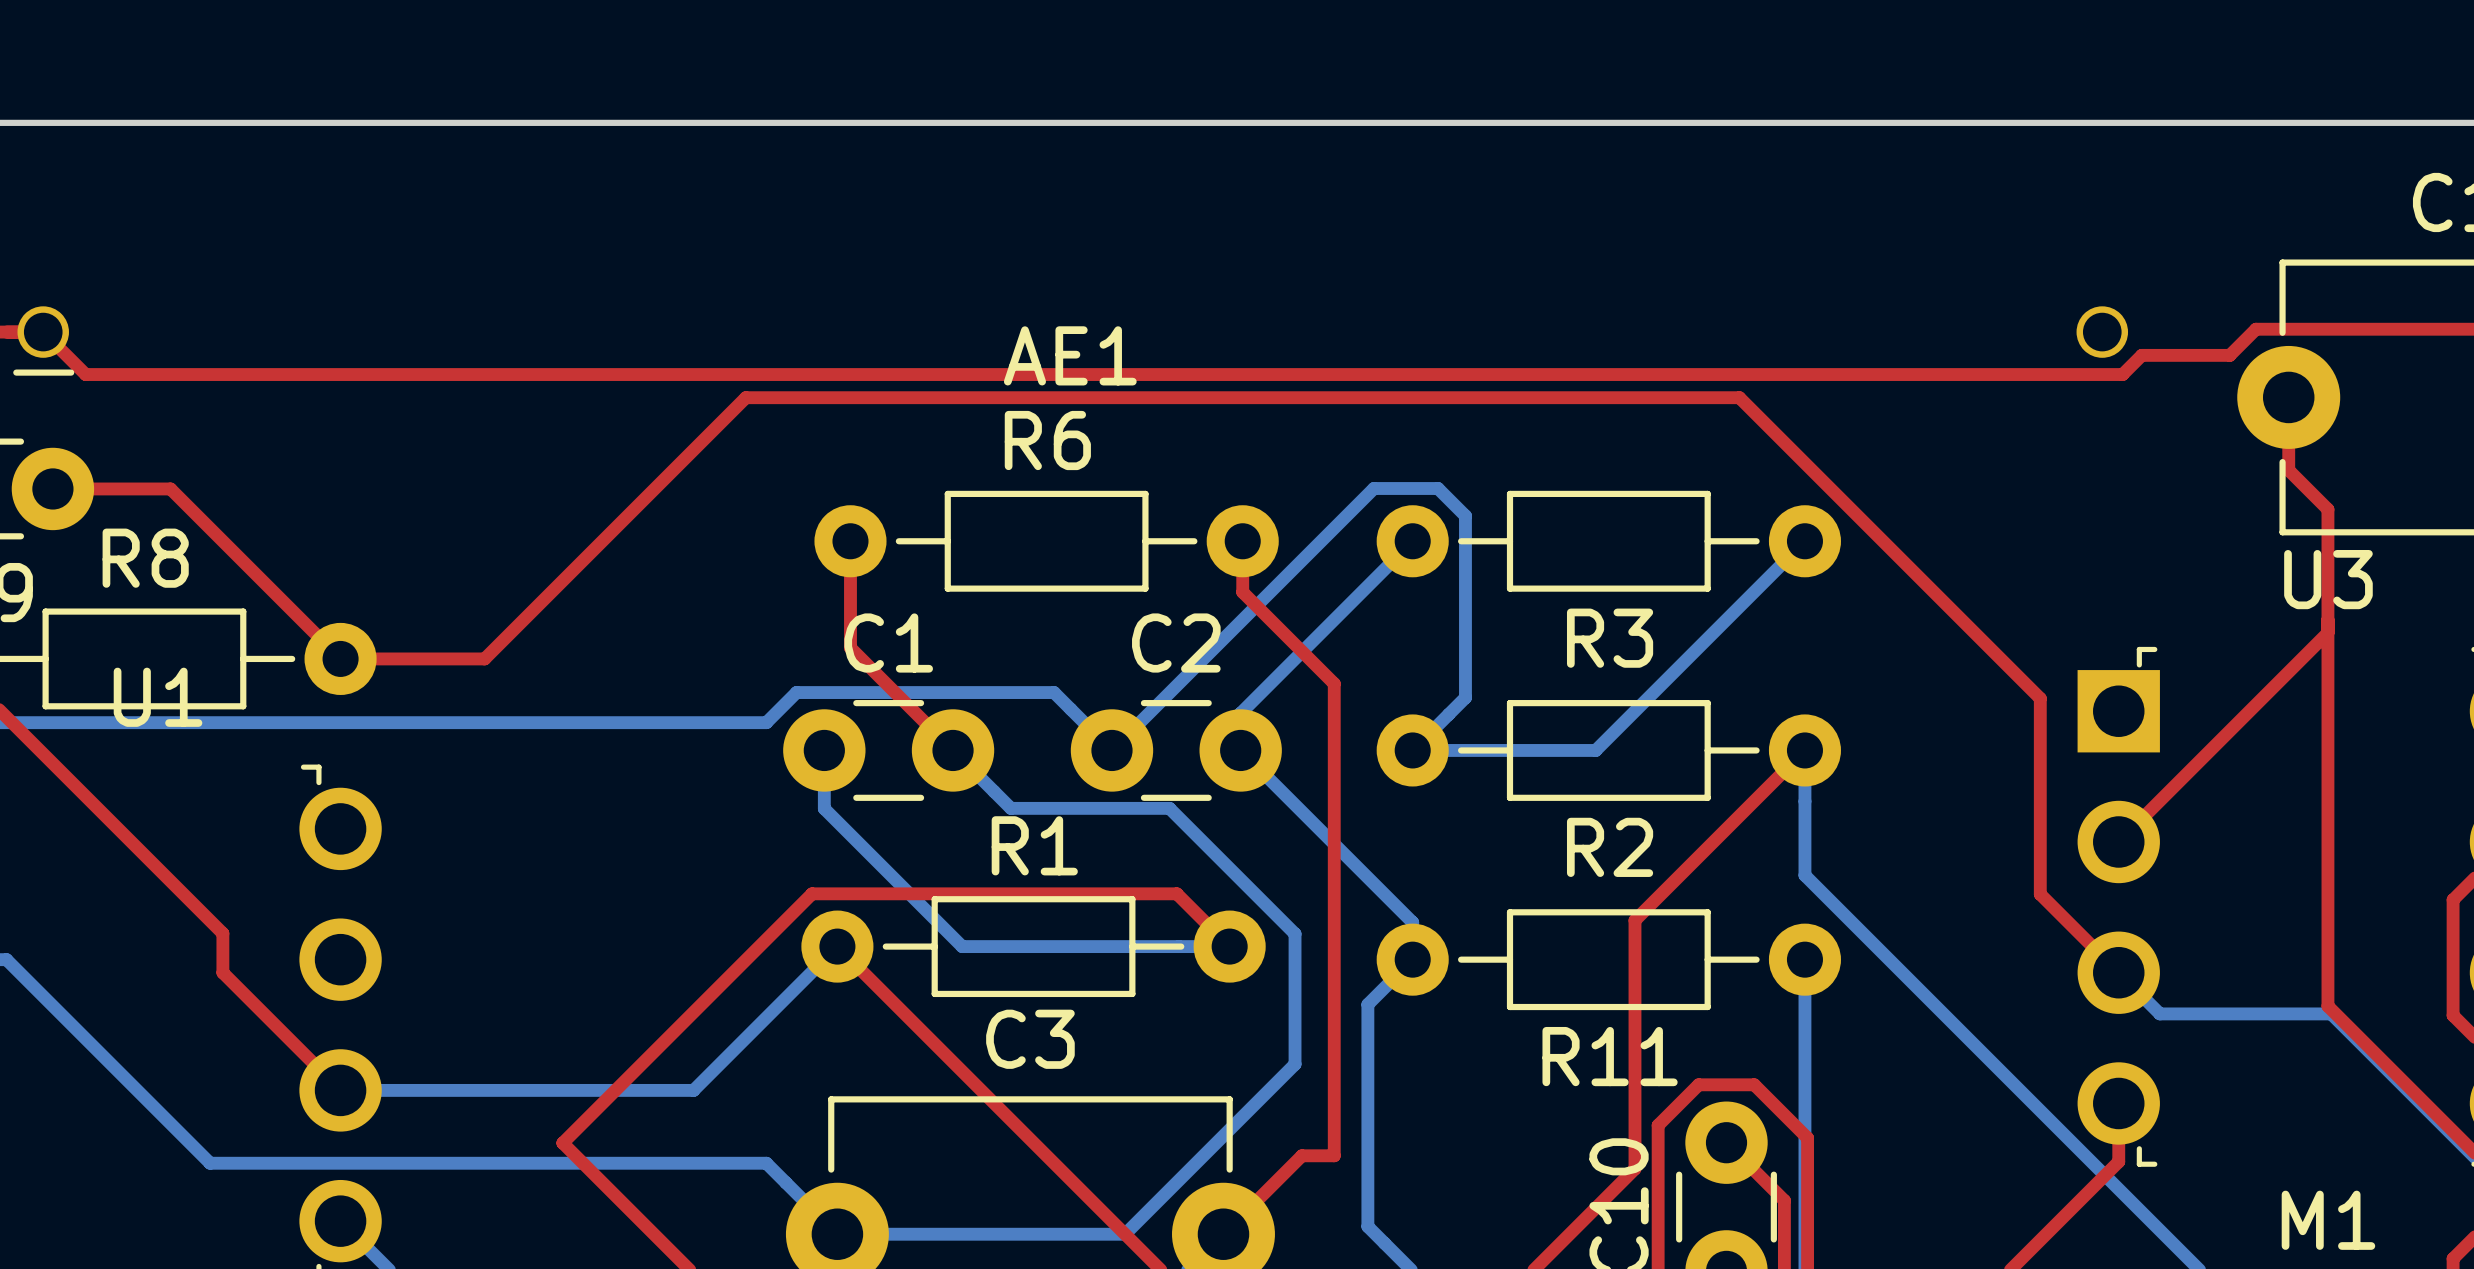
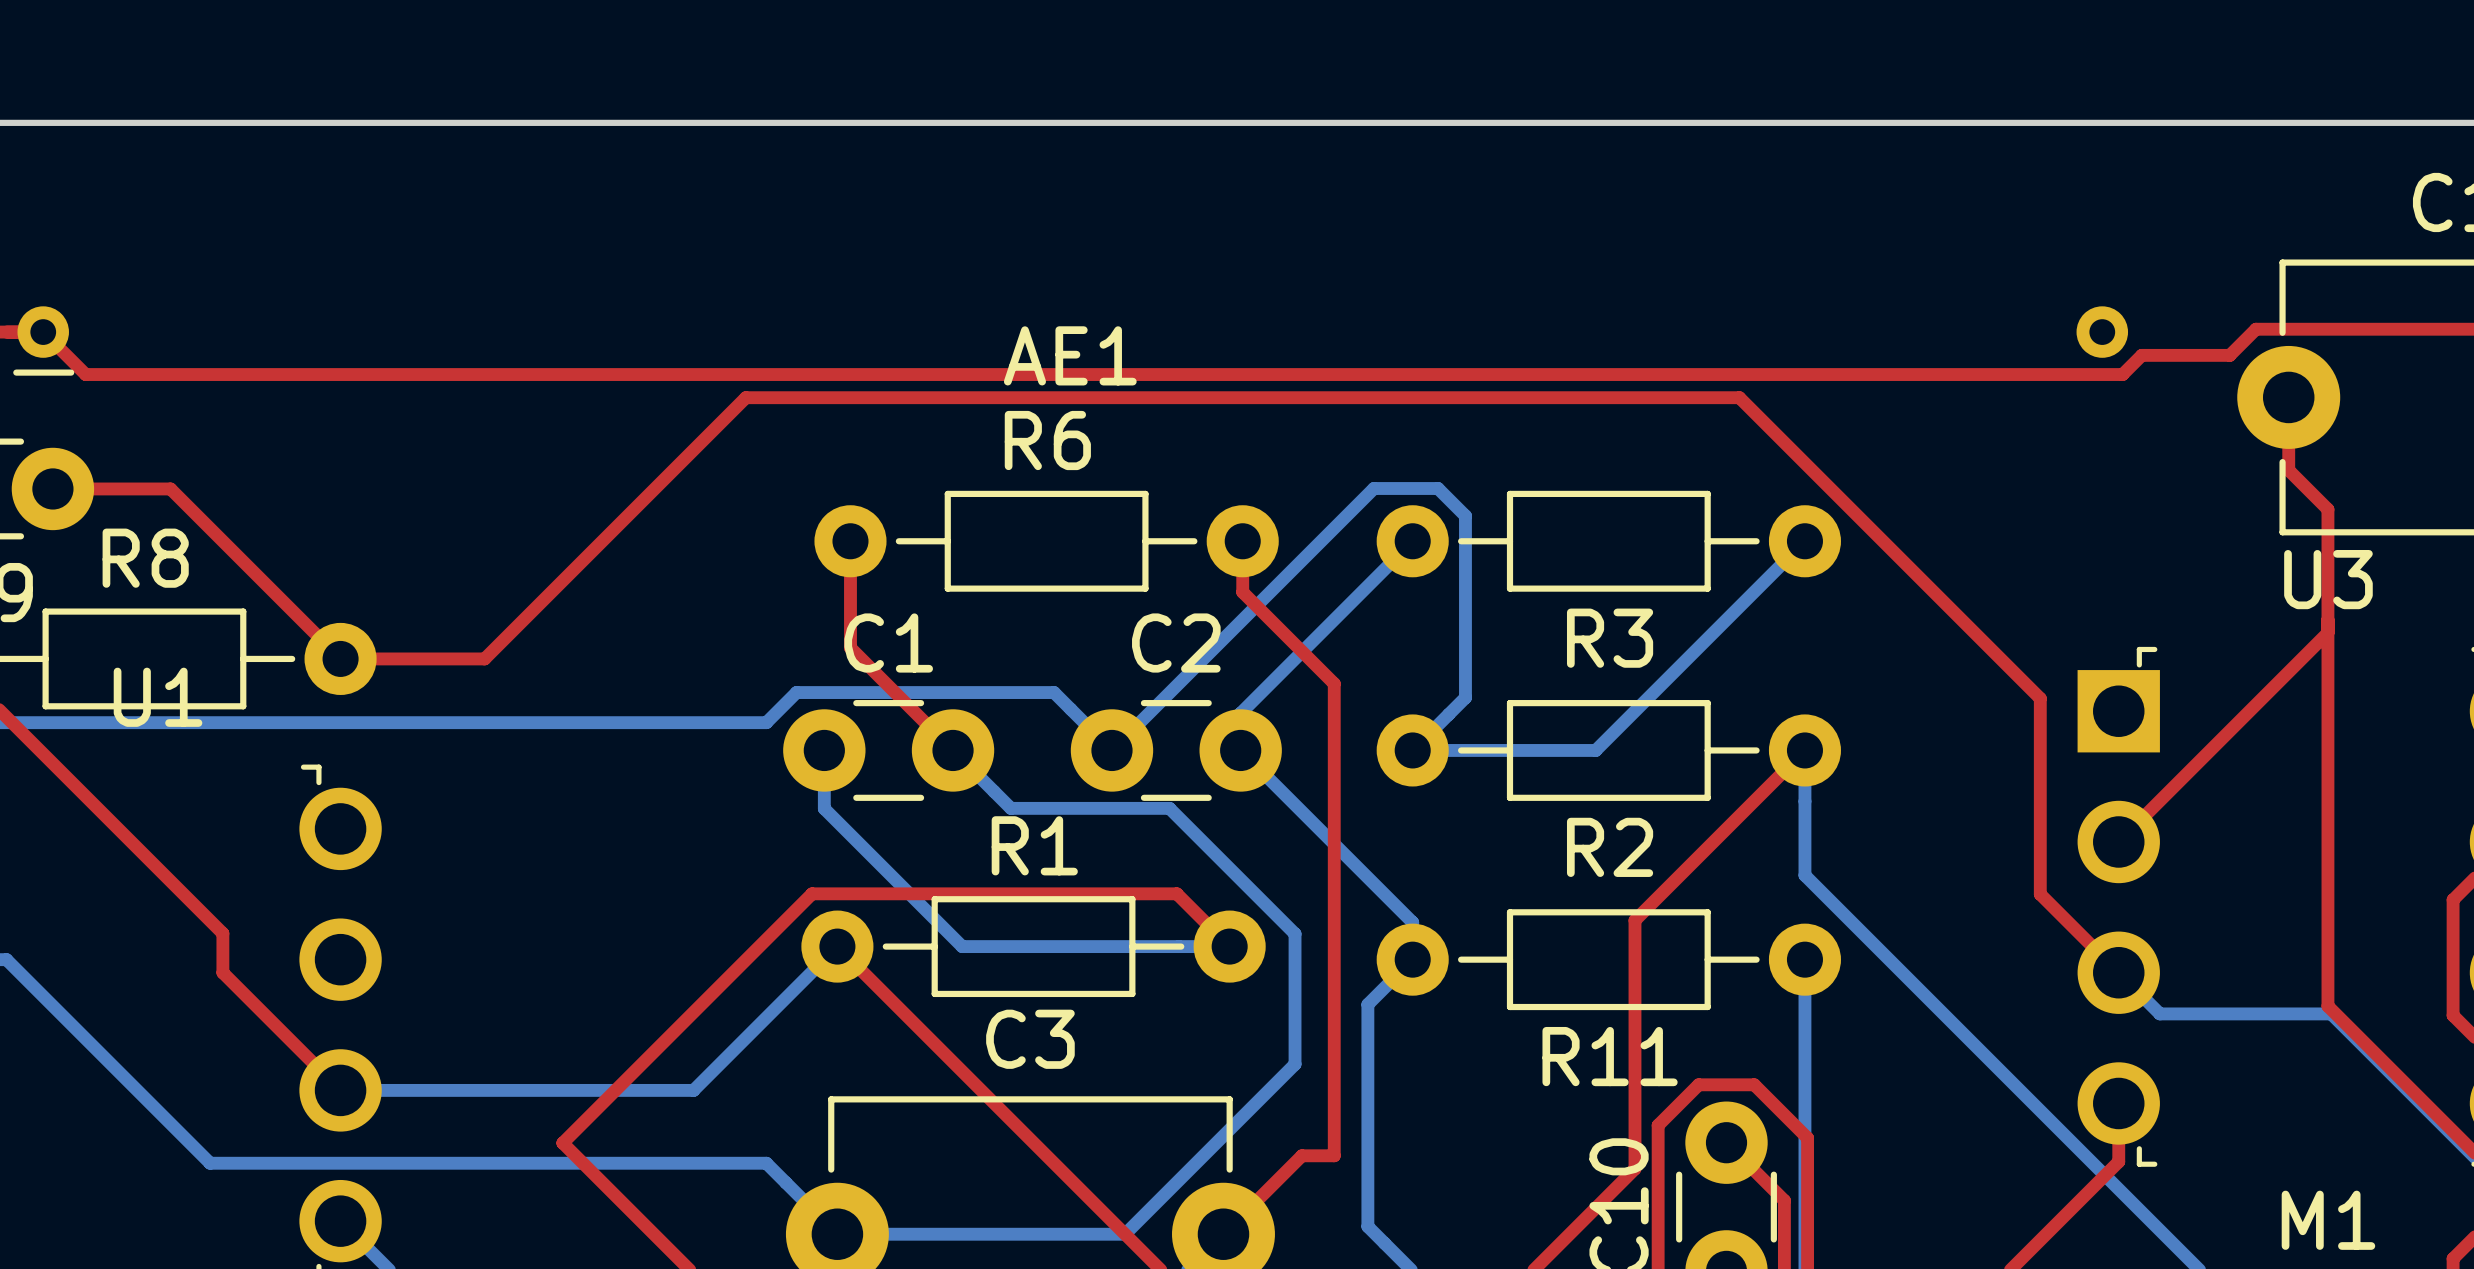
AE1 footprint: [13, 306, 2129, 376] -> [13, 306, 2129, 376]

